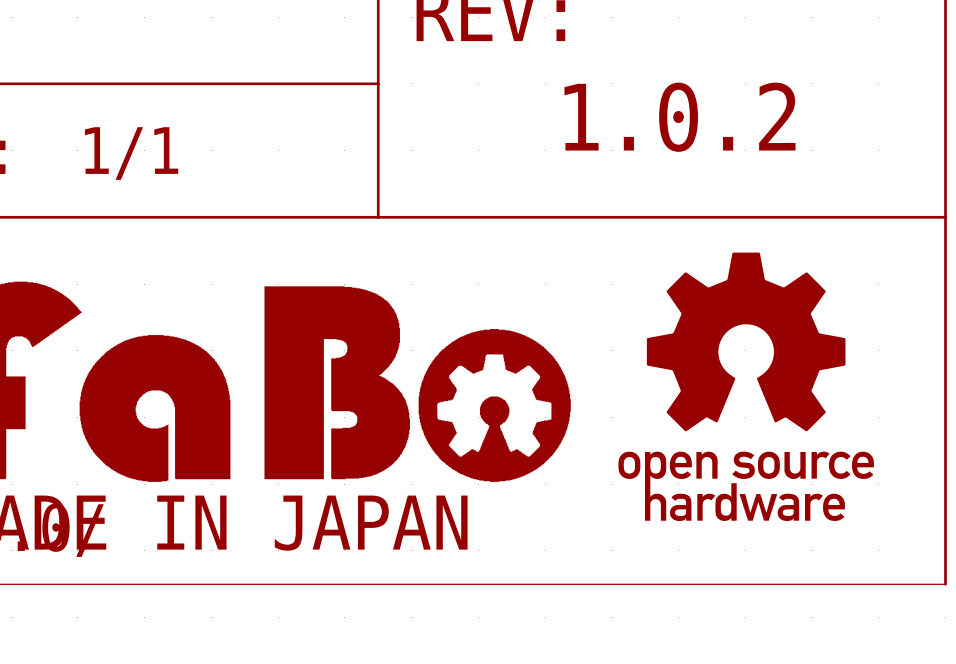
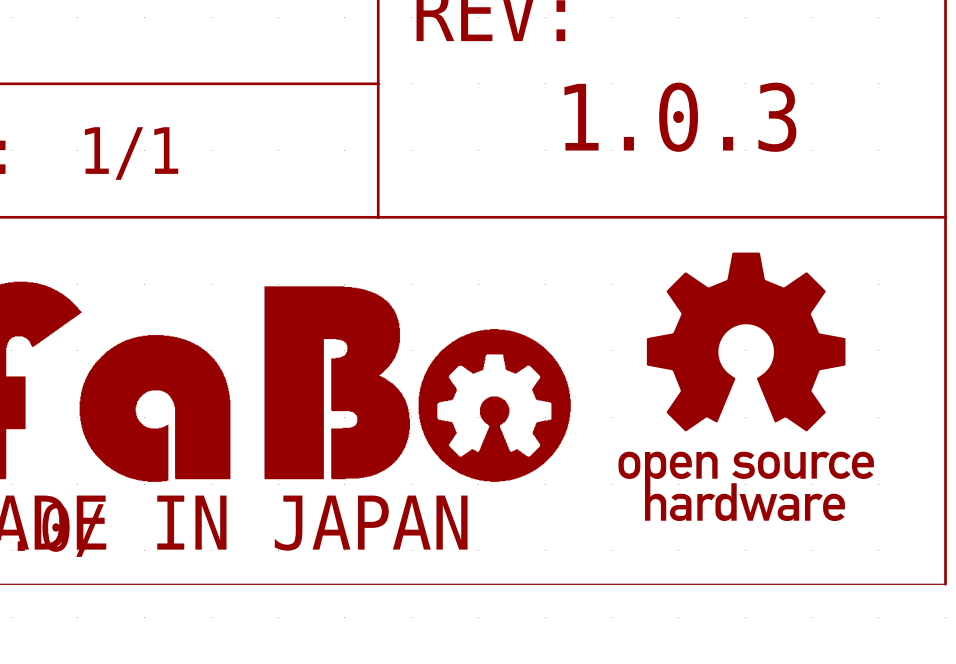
text: 1.0.2 (680, 117) -> 1.0.3 (680, 117)

